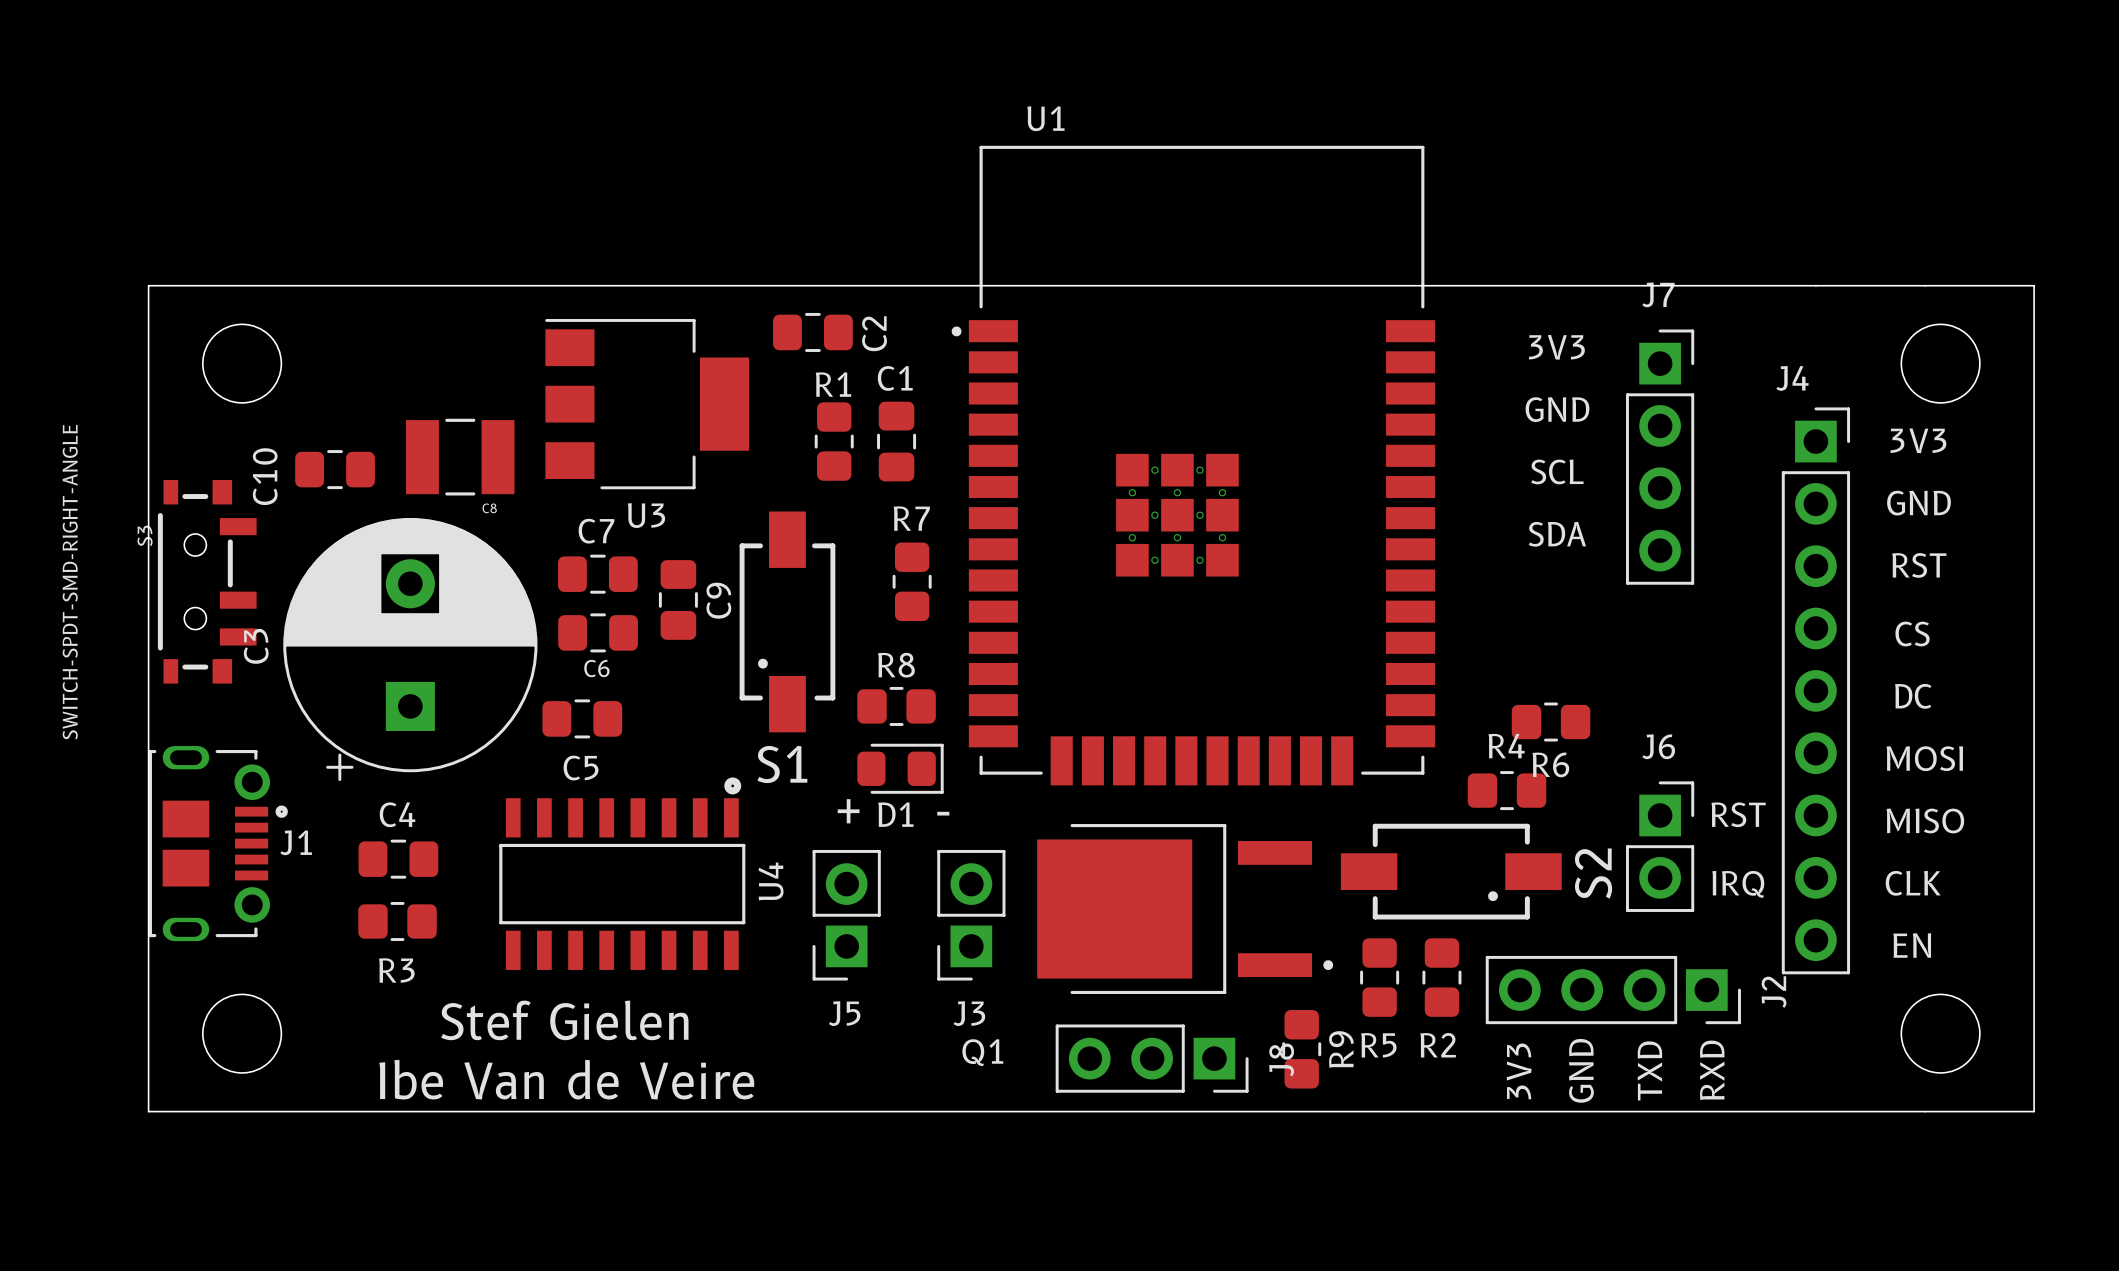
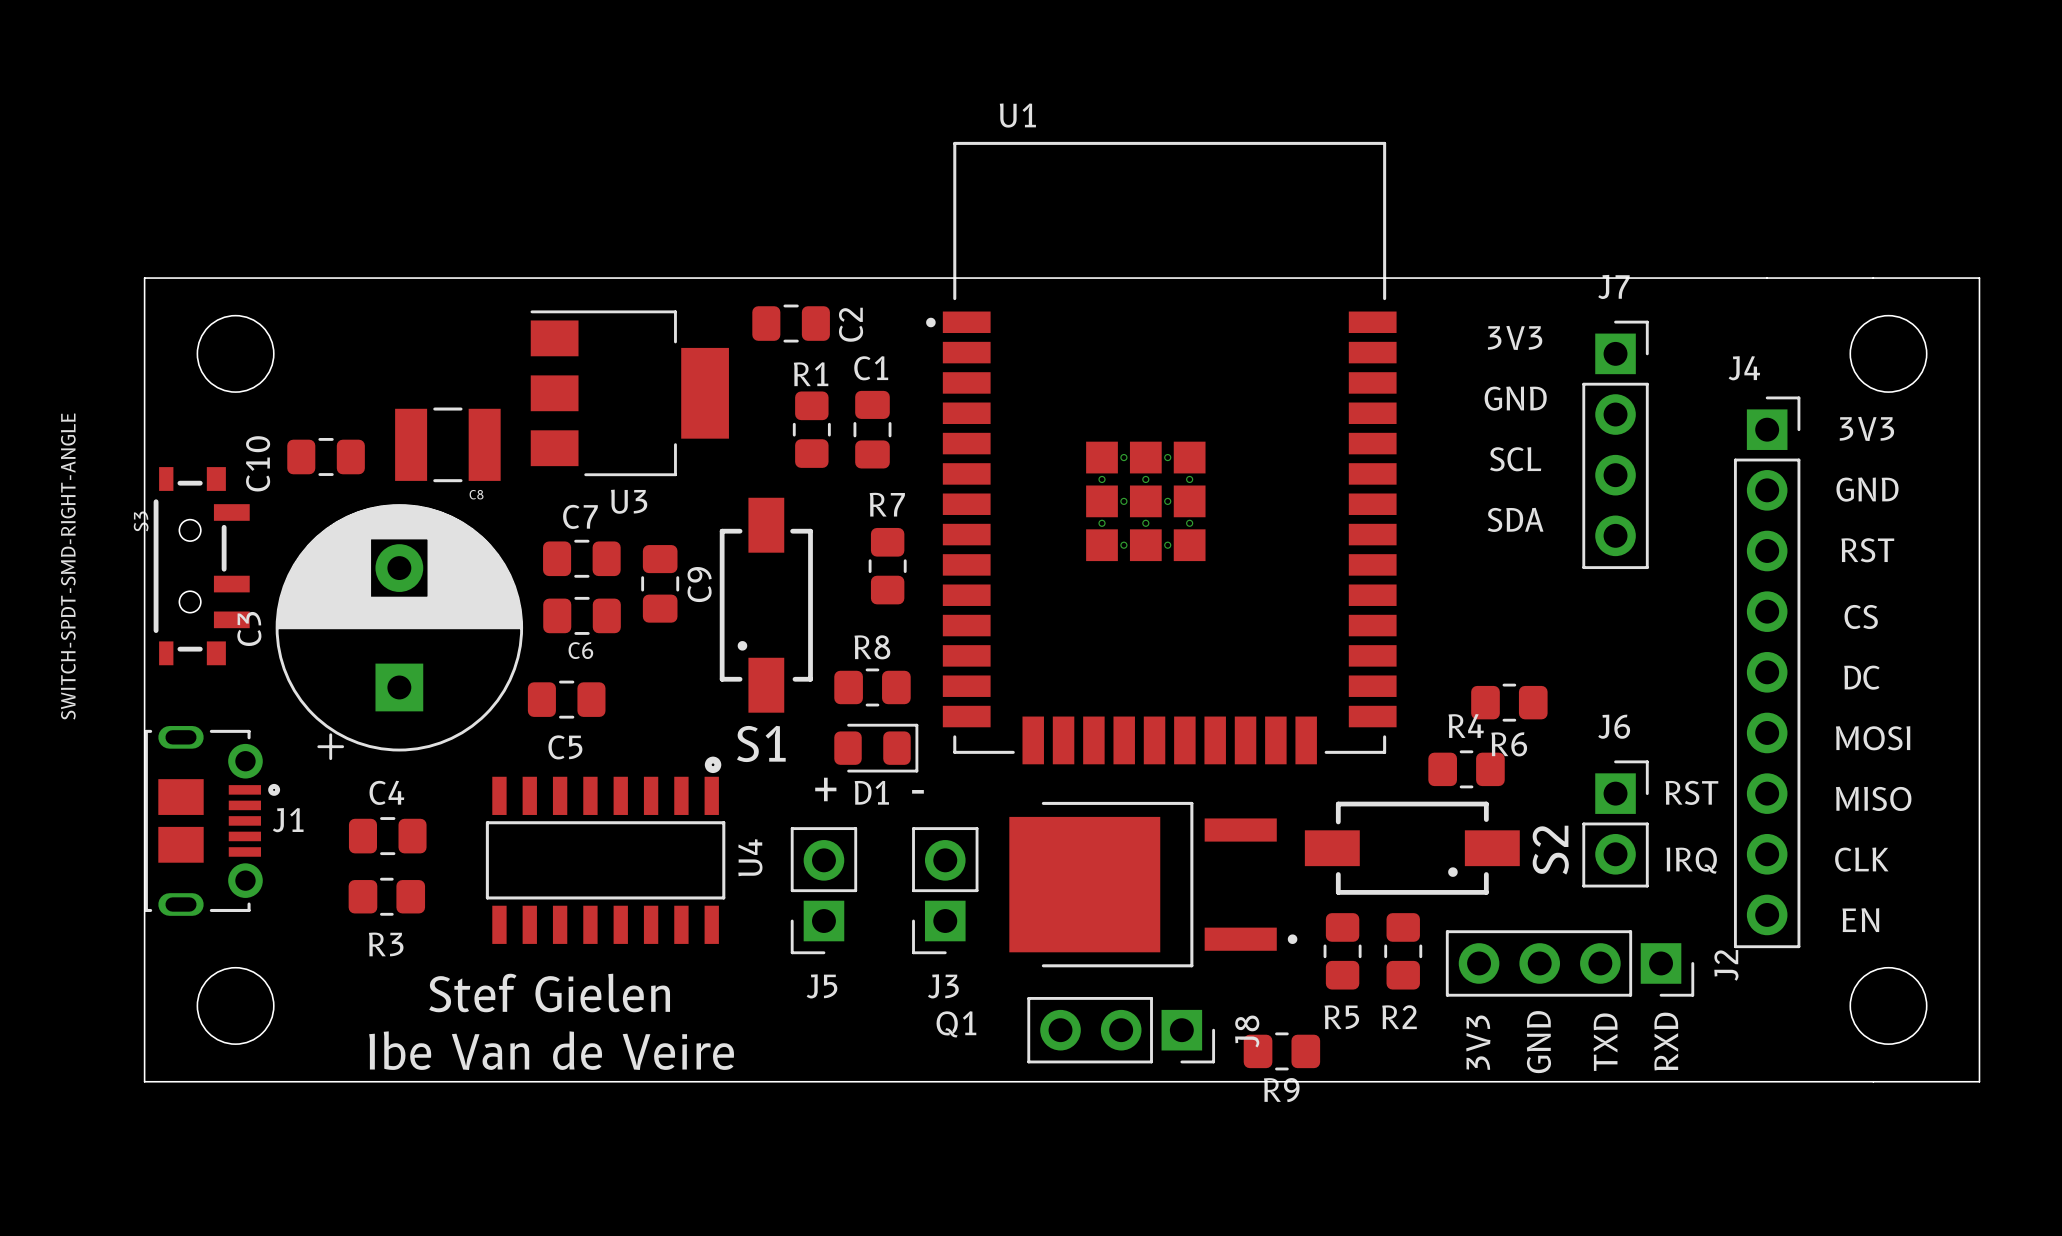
R9 rotation: 0° (1301, 1049) -> 90° clockwise (1281, 1051)

